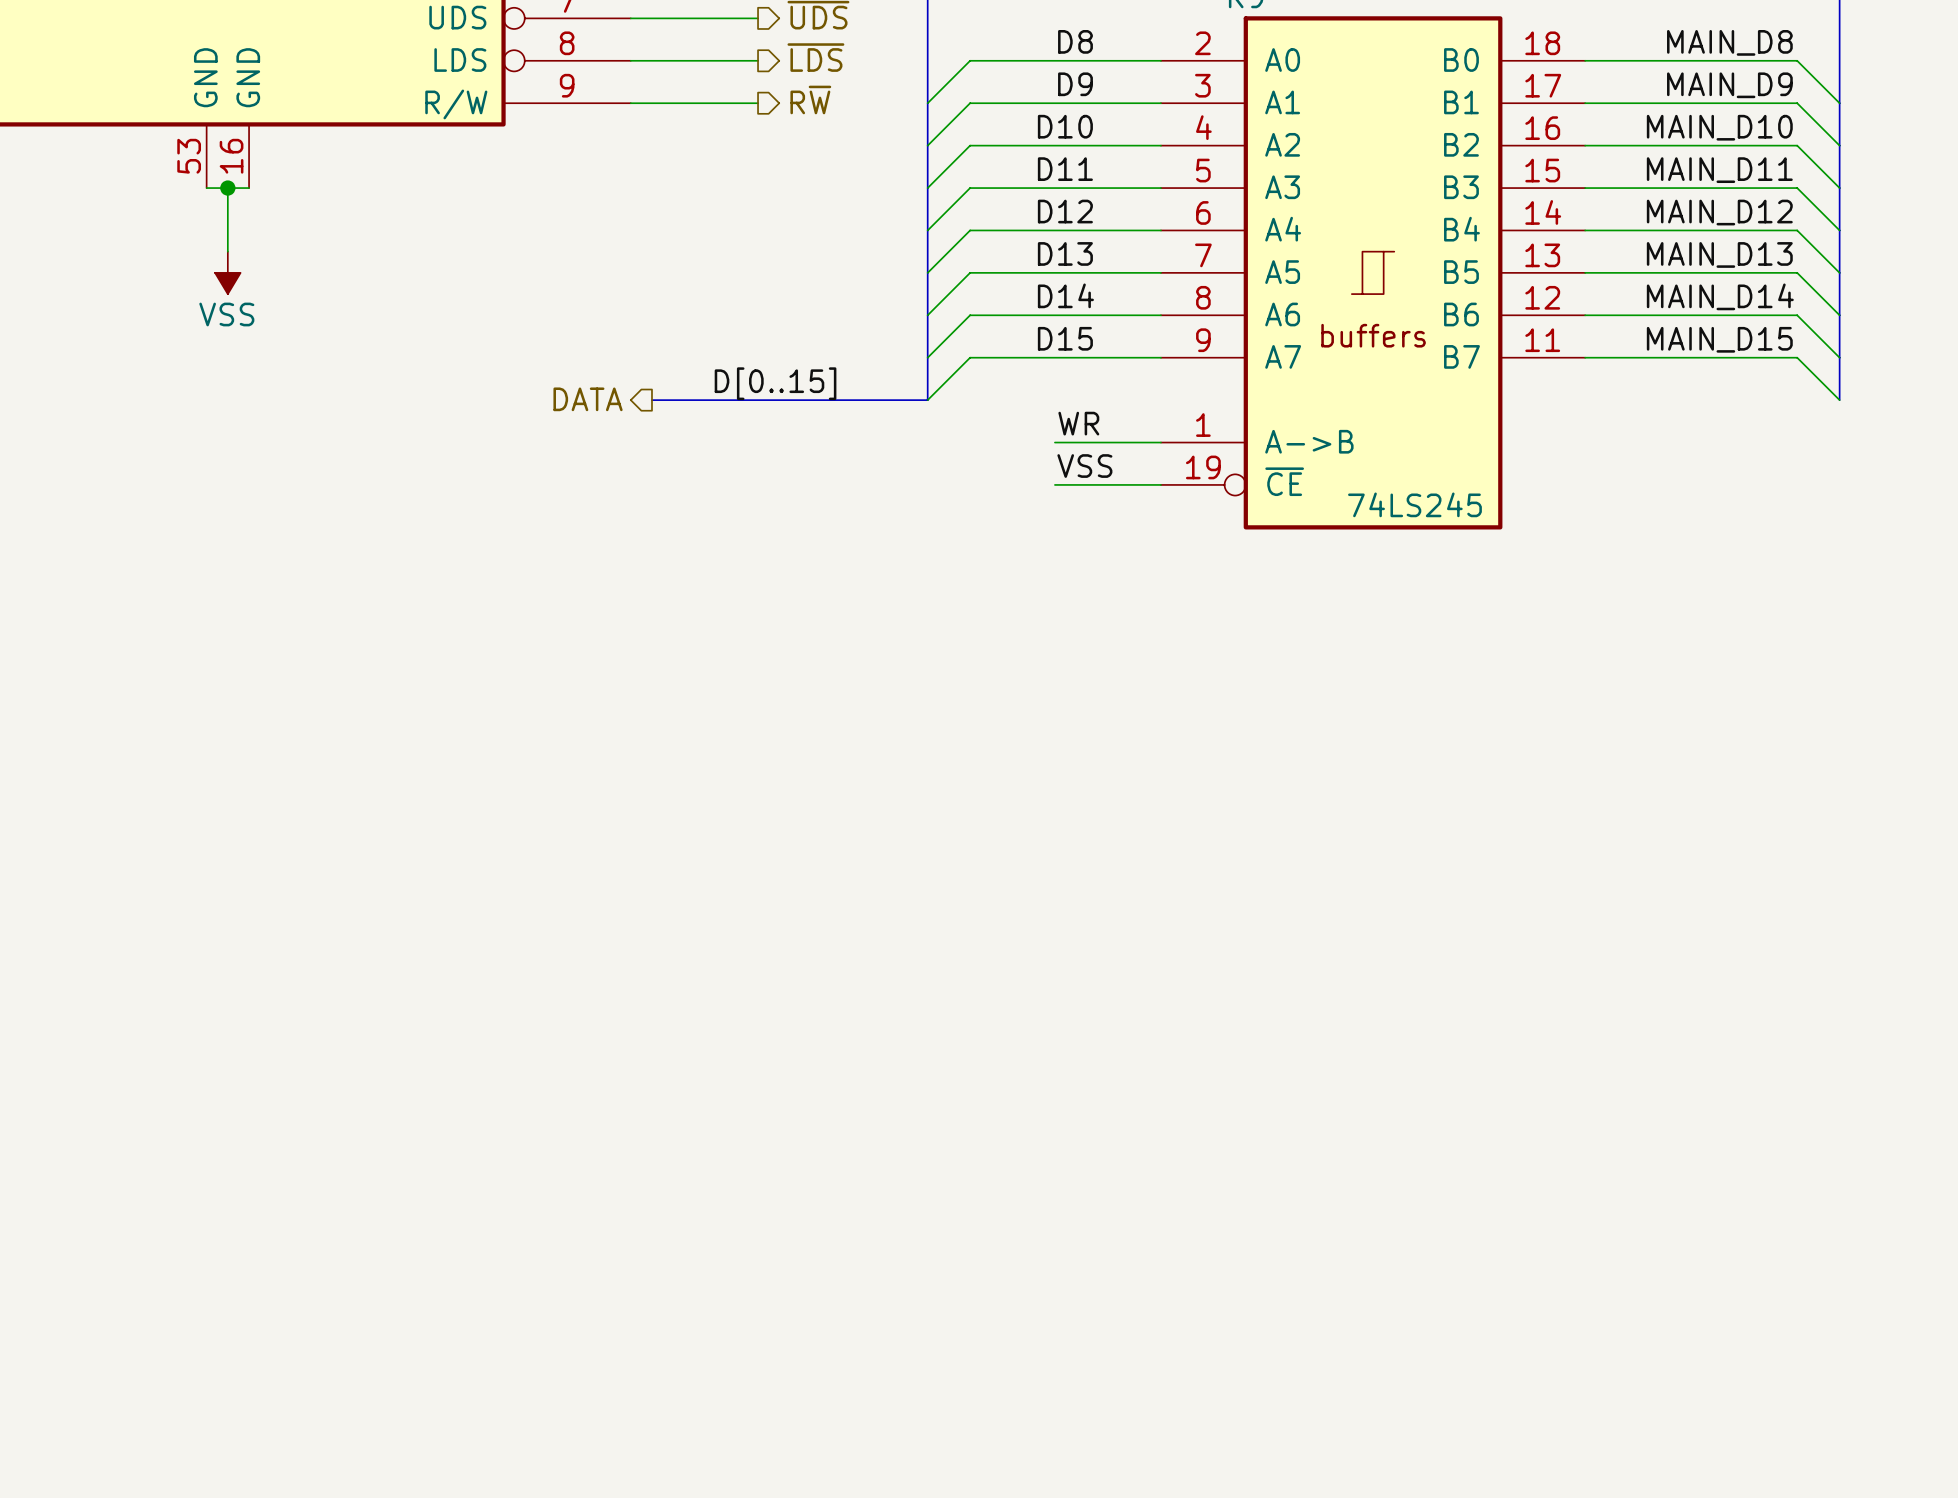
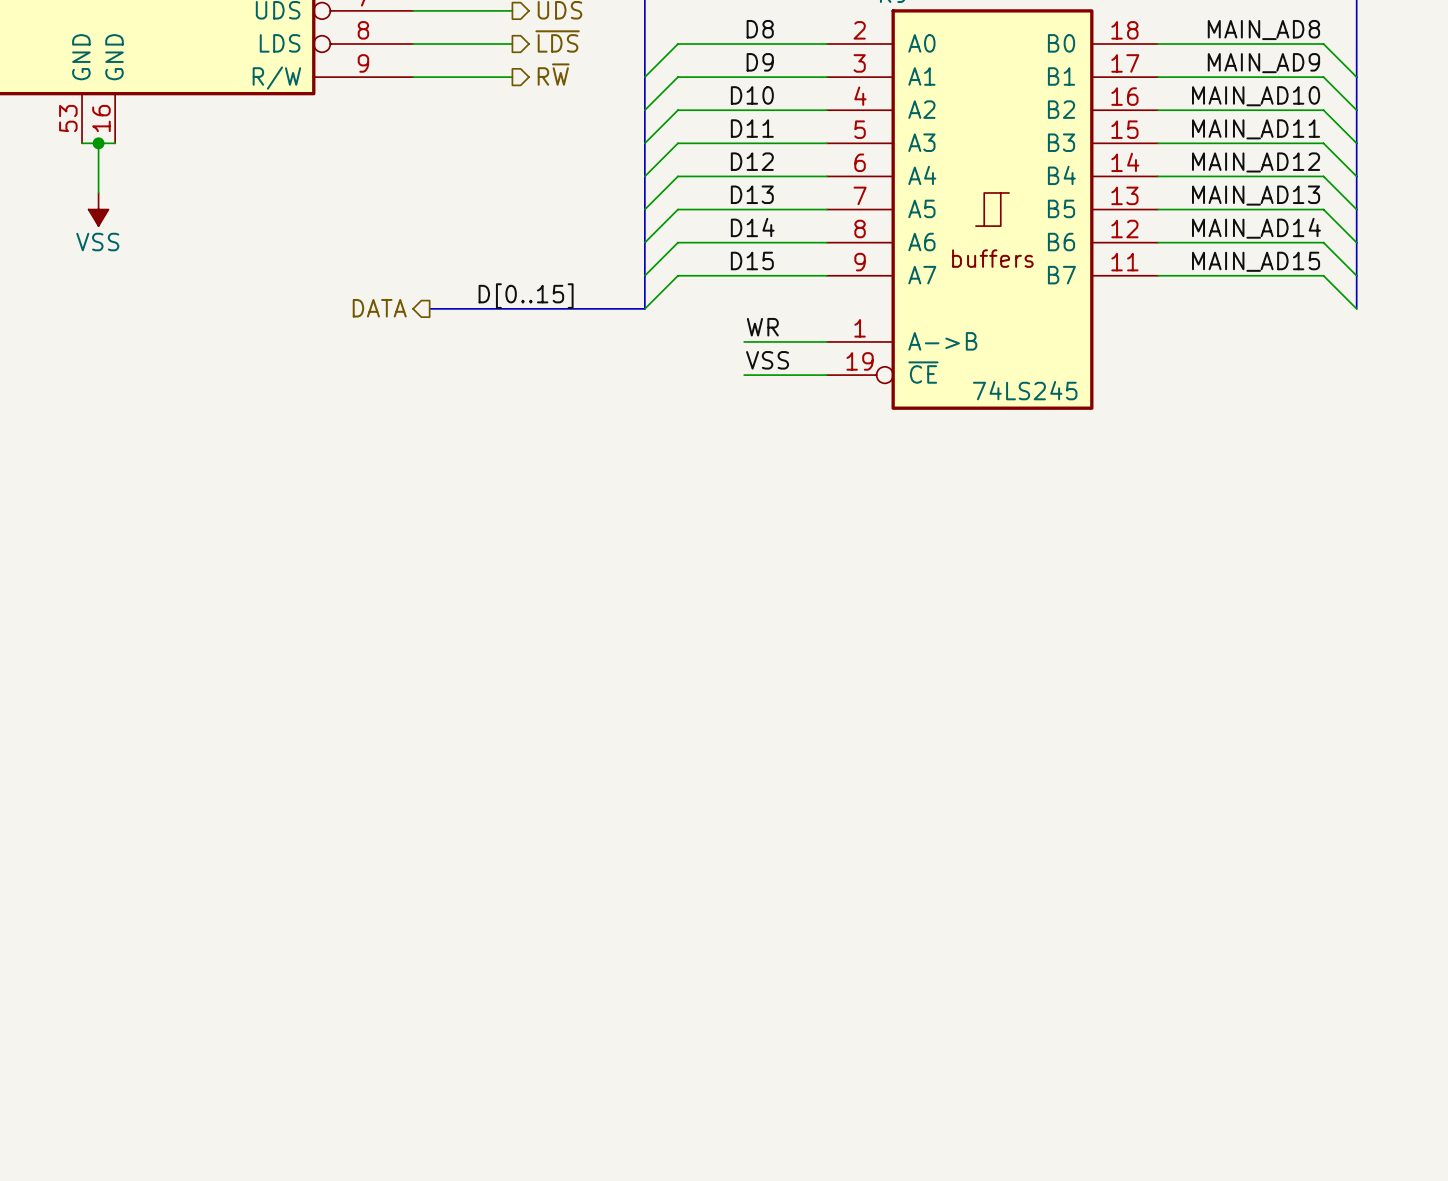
label: MAIN_D8 (1729, 42) -> MAIN_AD8 (1263, 30)
label: MAIN_D9 (1729, 85) -> MAIN_AD9 (1263, 63)
label: MAIN_D10 (1719, 127) -> MAIN_AD10 (1256, 96)
label: MAIN_D11 (1719, 170) -> MAIN_AD11 (1256, 129)
label: MAIN_D12 (1719, 212) -> MAIN_AD12 (1256, 162)
label: MAIN_D13 (1719, 254) -> MAIN_AD13 (1256, 195)
label: MAIN_D14 (1720, 296) -> MAIN_AD14 (1256, 228)
label: MAIN_D15 (1719, 339) -> MAIN_AD15 (1256, 261)

